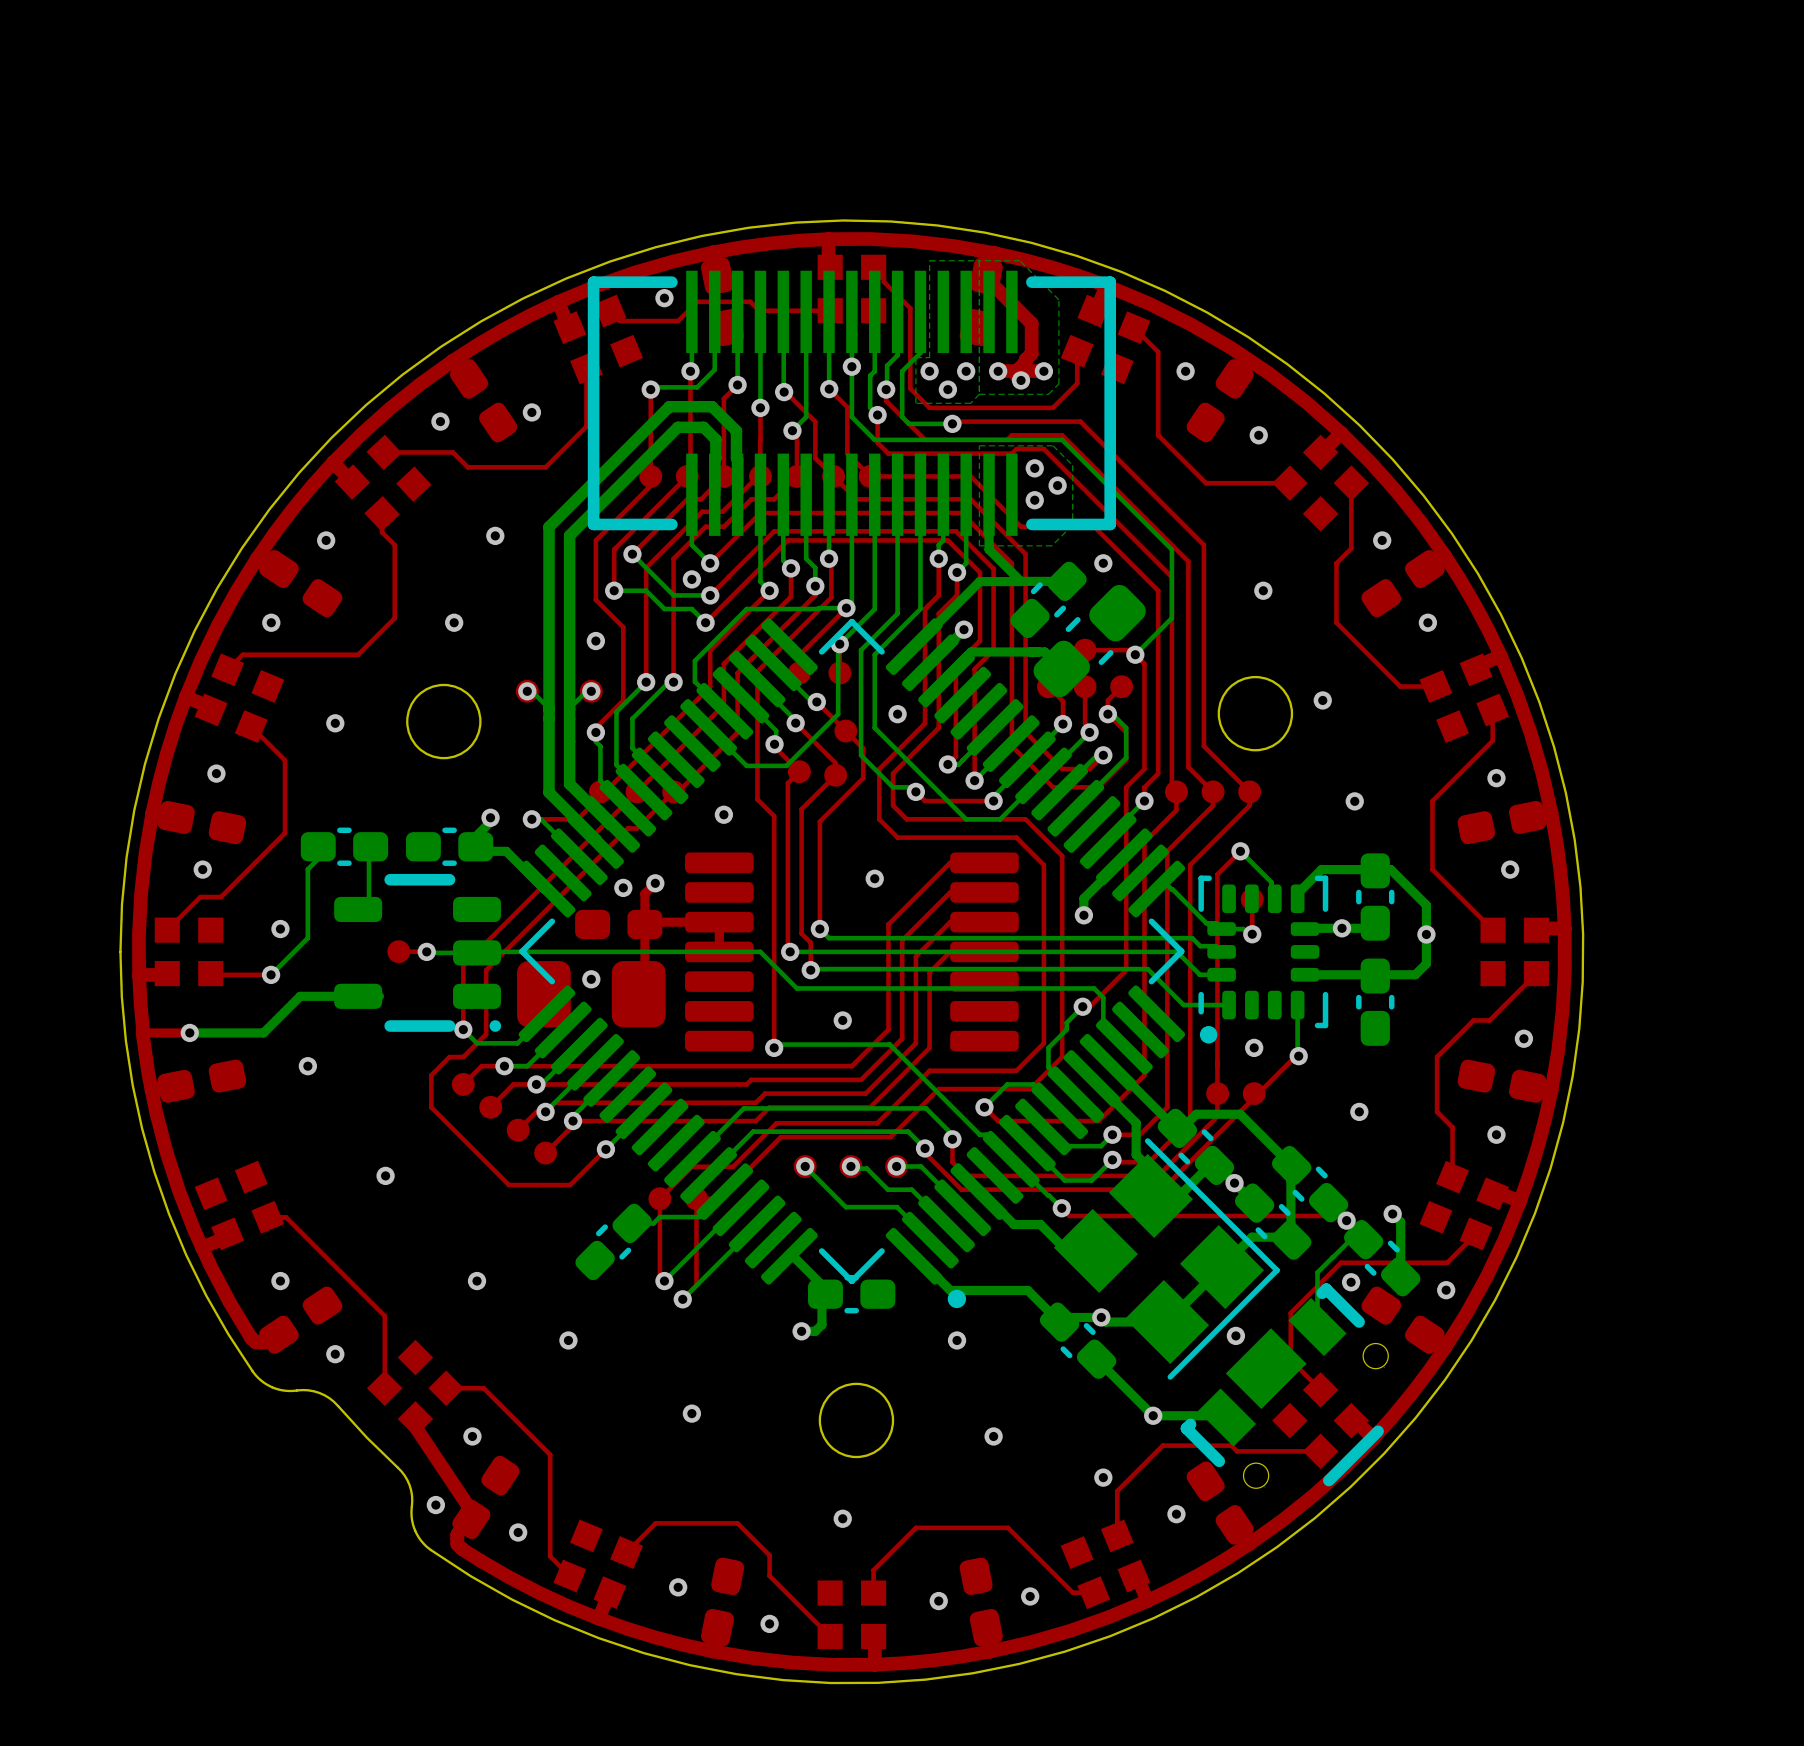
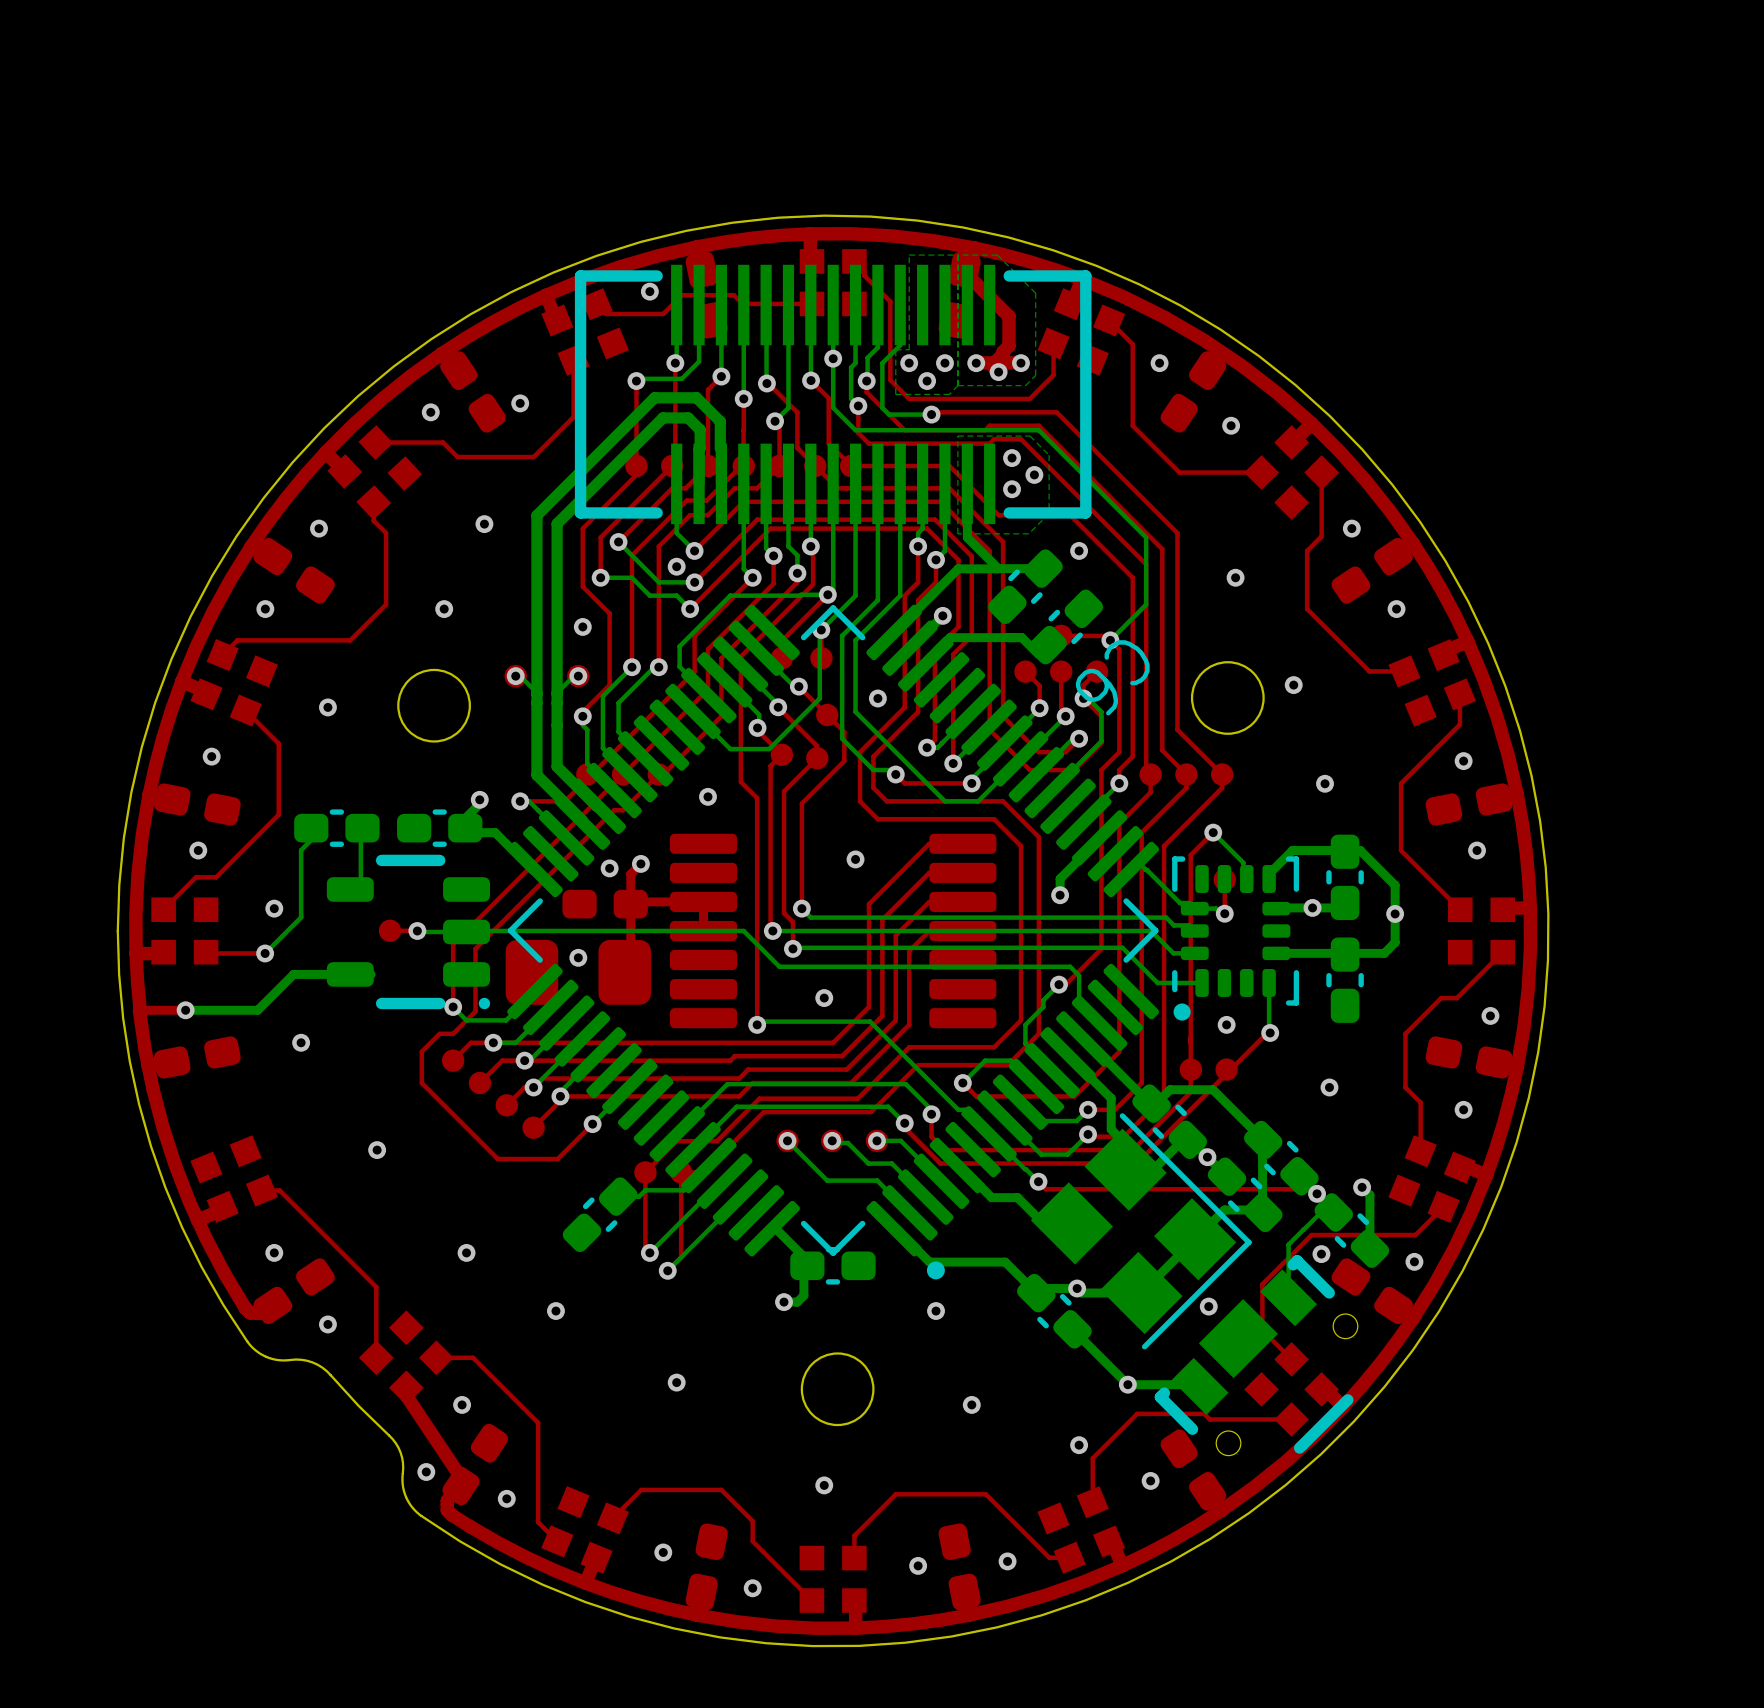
part: (1089, 641) -> none
C6: none -> (1065, 626)

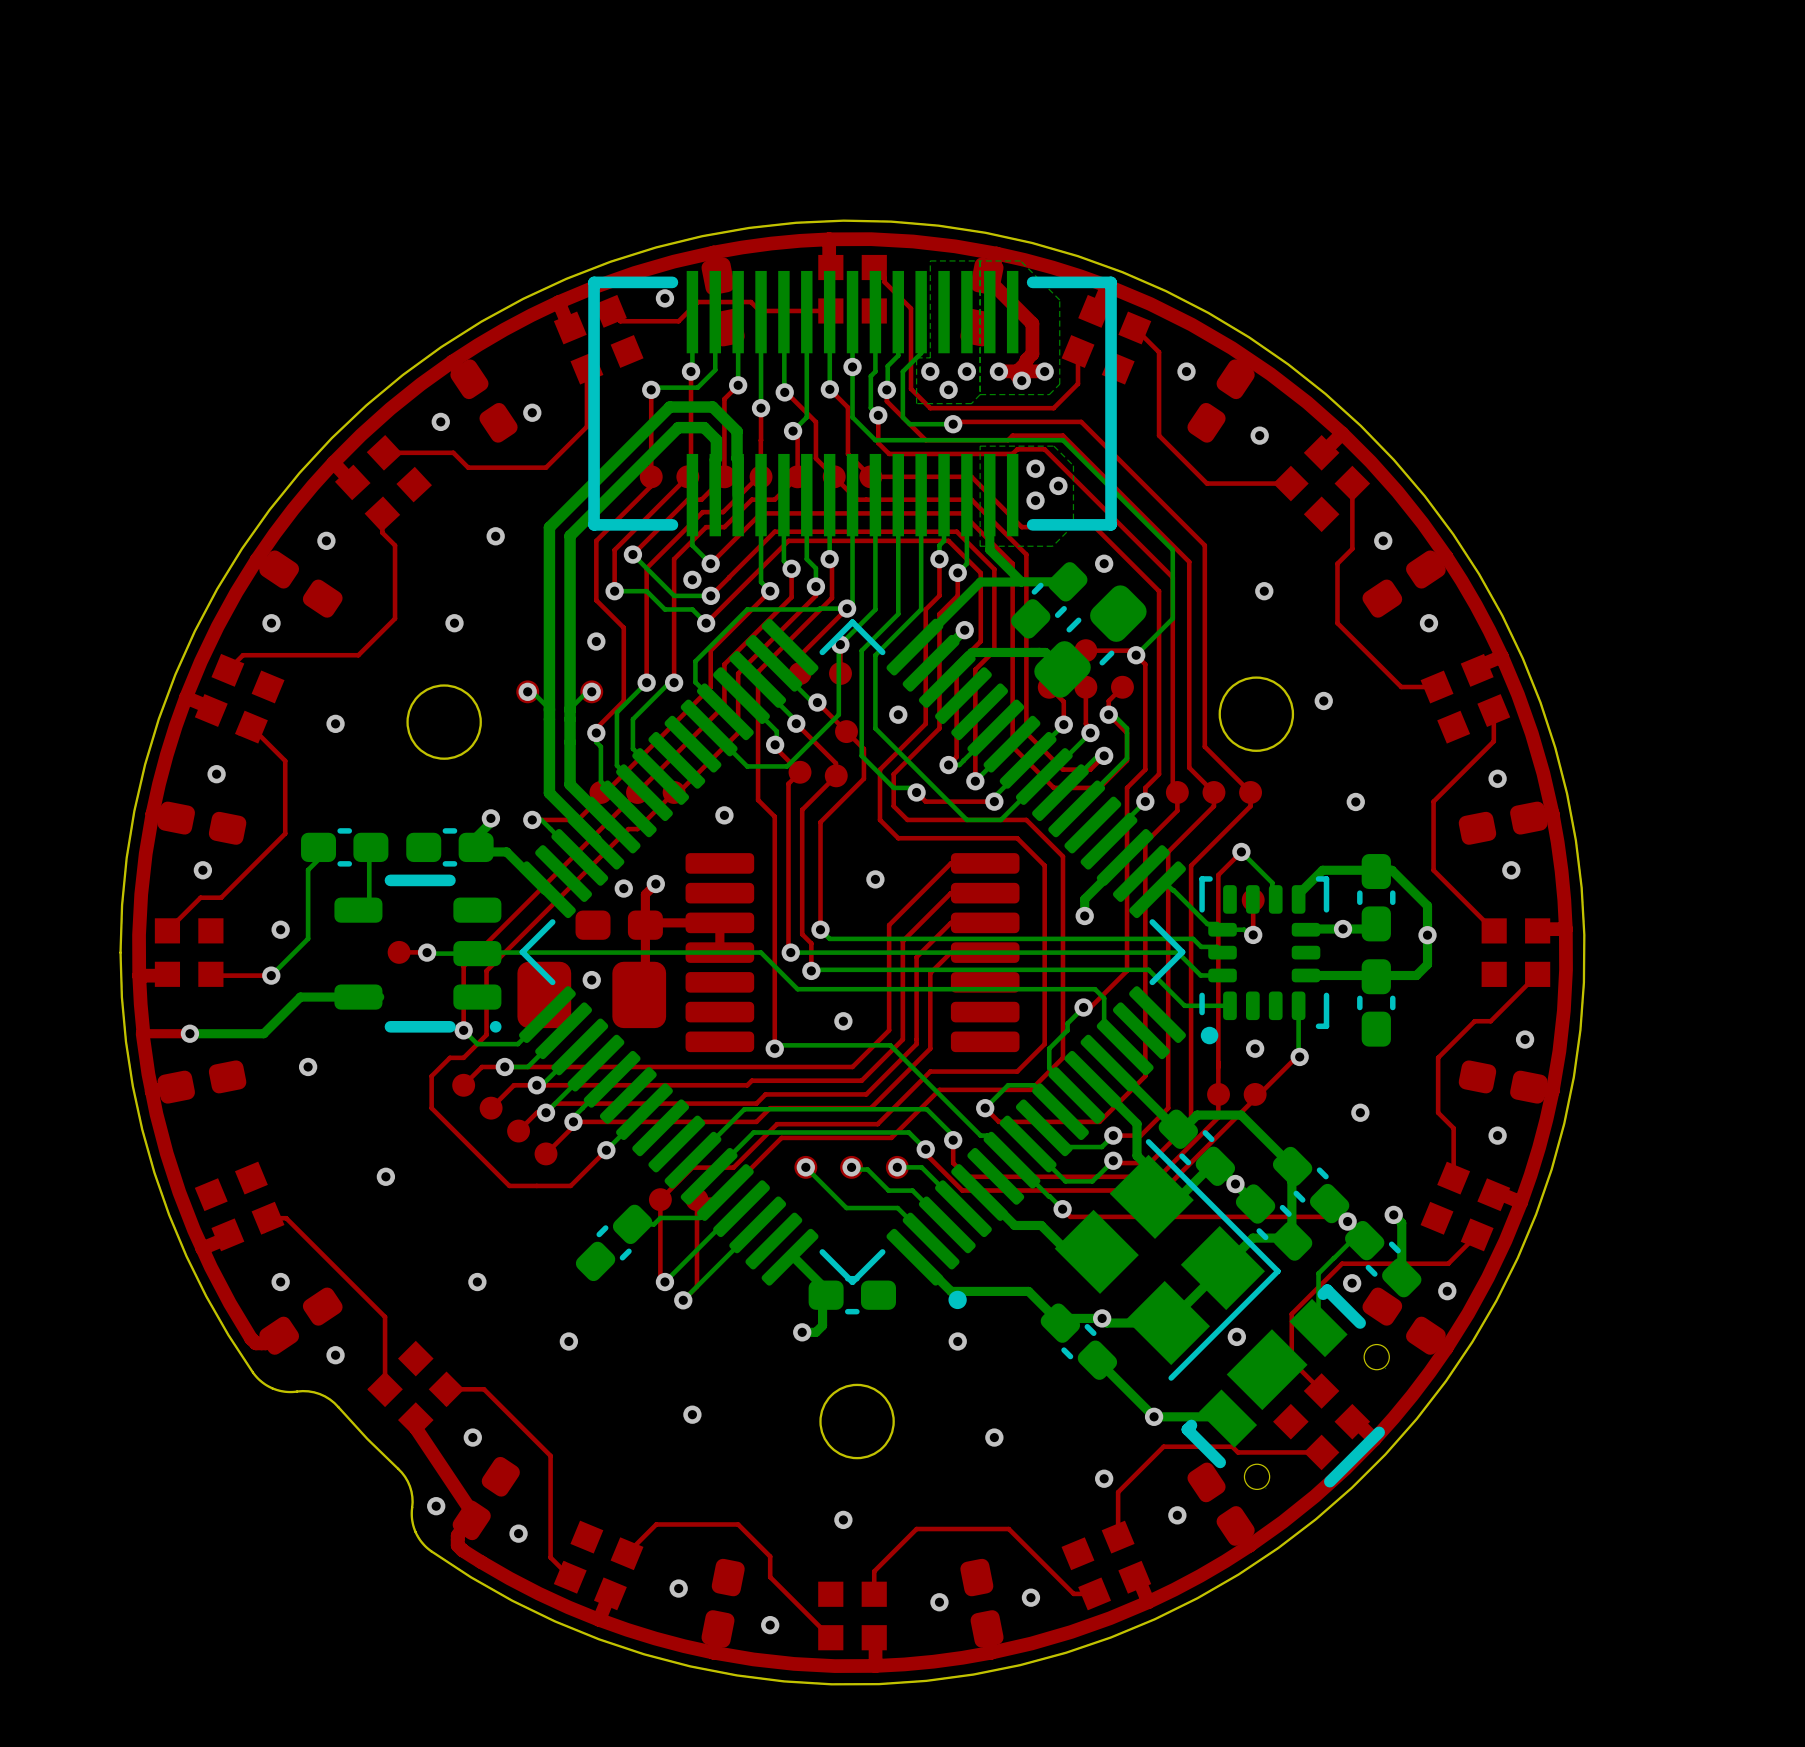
C6: (1065, 626) -> none
part: none -> (1090, 641)

